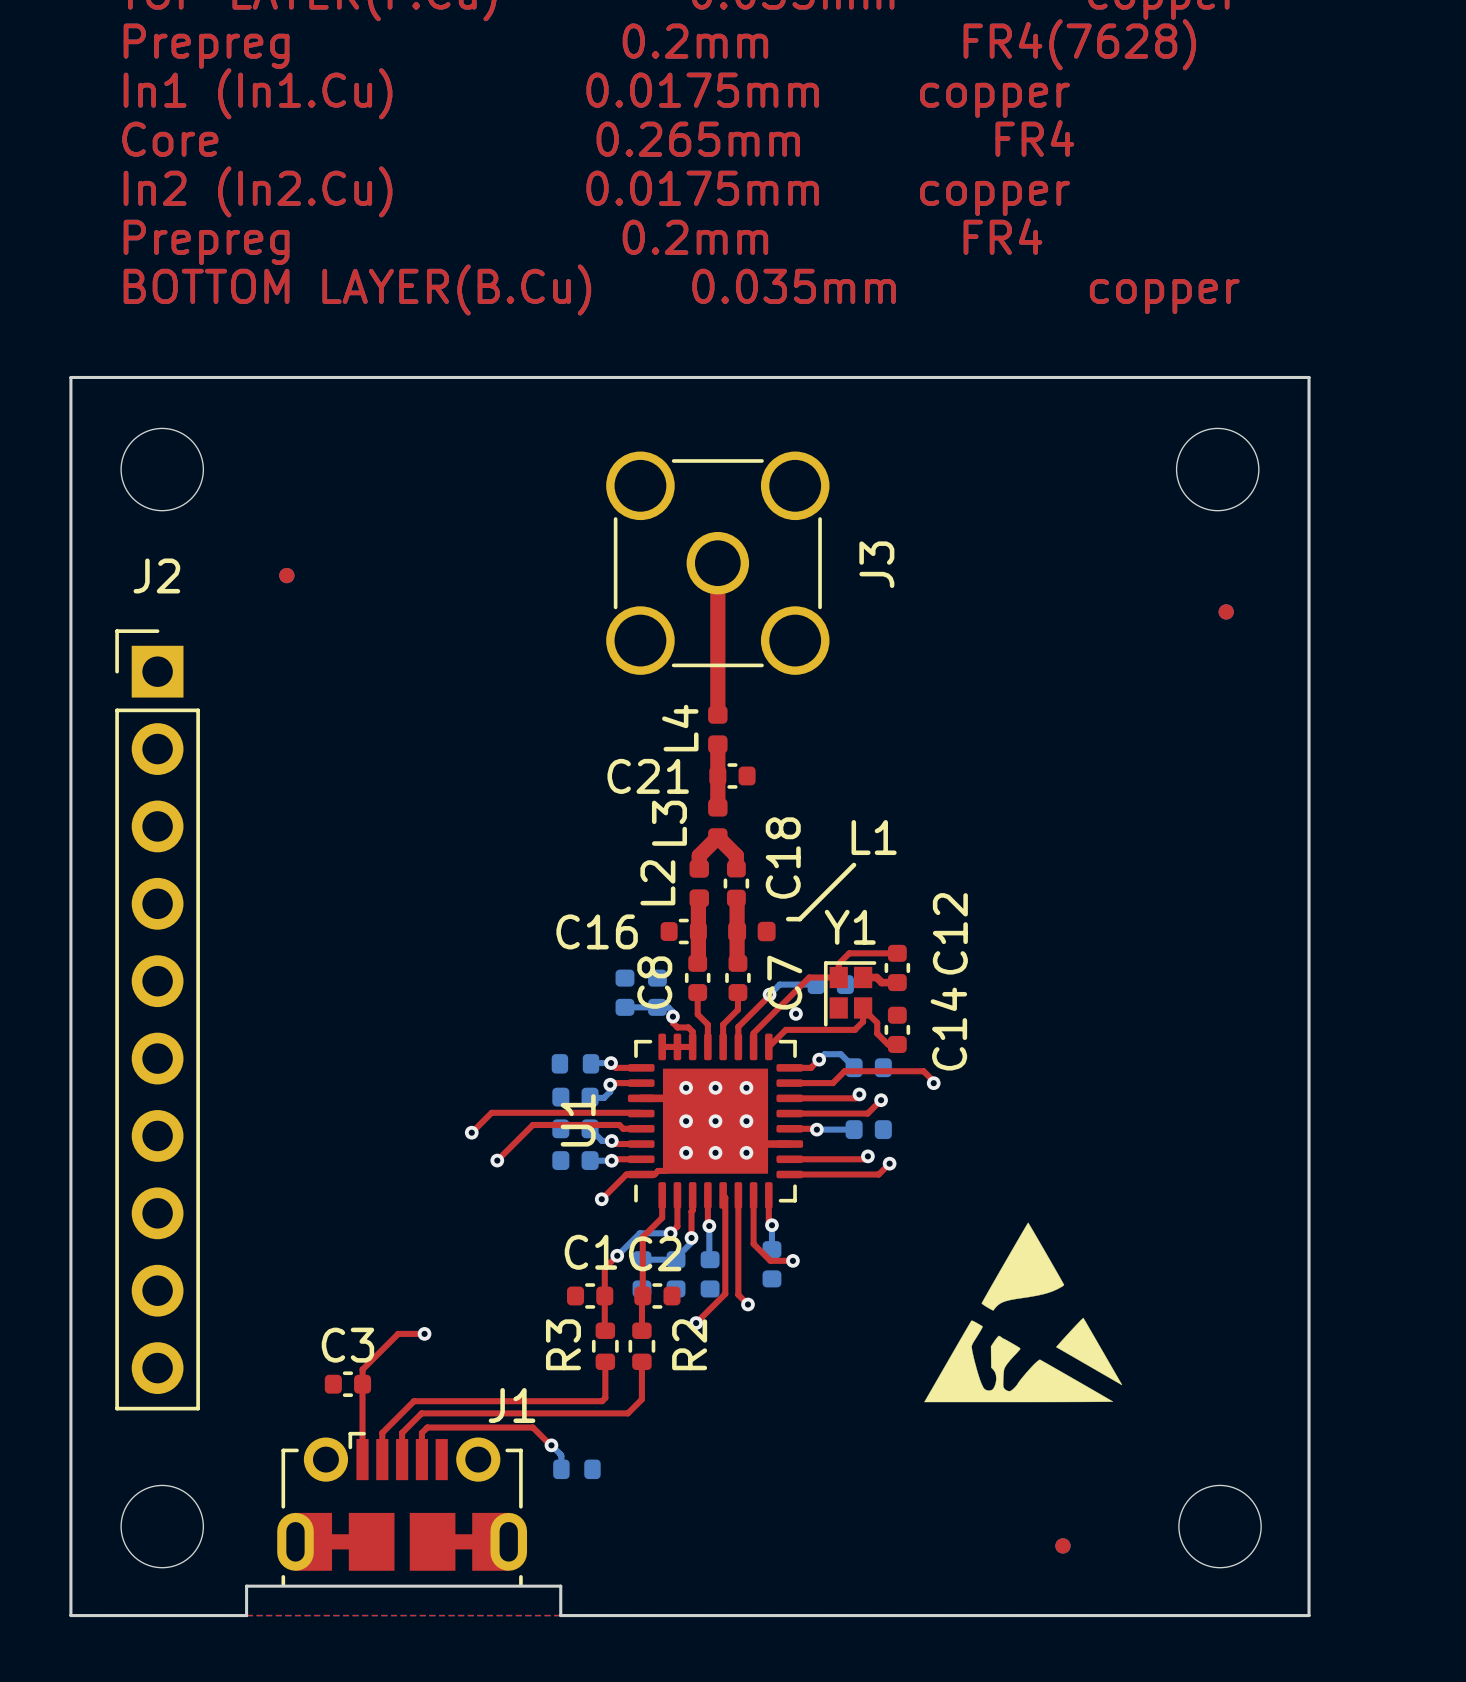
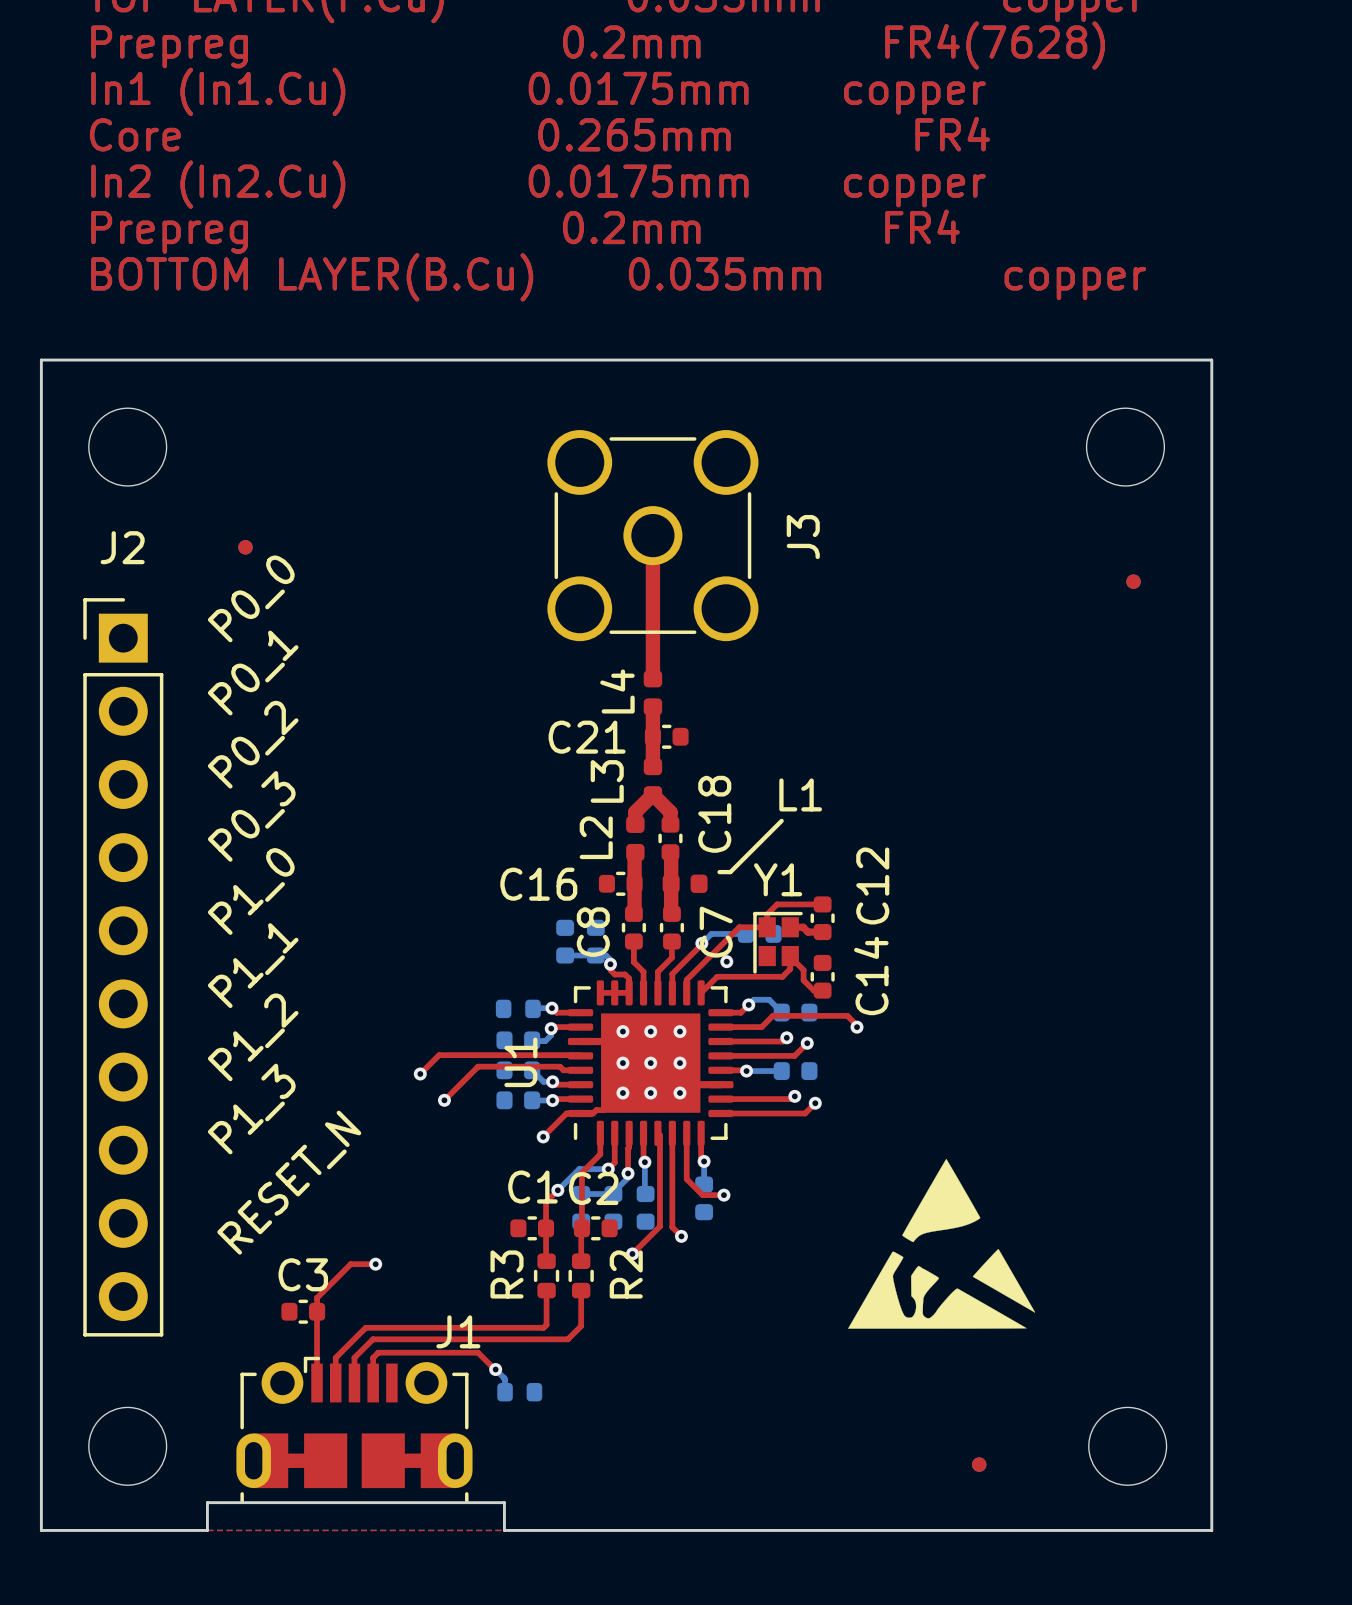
text: none -> P0_0 (251, 598)
text: none -> P0_1 (253, 673)
text: none -> P0_2 (253, 744)
text: none -> P0_3 (251, 816)
text: none -> P1_0 (251, 891)
text: none -> P1_1 (253, 965)
text: none -> P1_2 (253, 1037)
text: none -> P1_3 (251, 1109)
text: none -> RESET_N (289, 1182)

